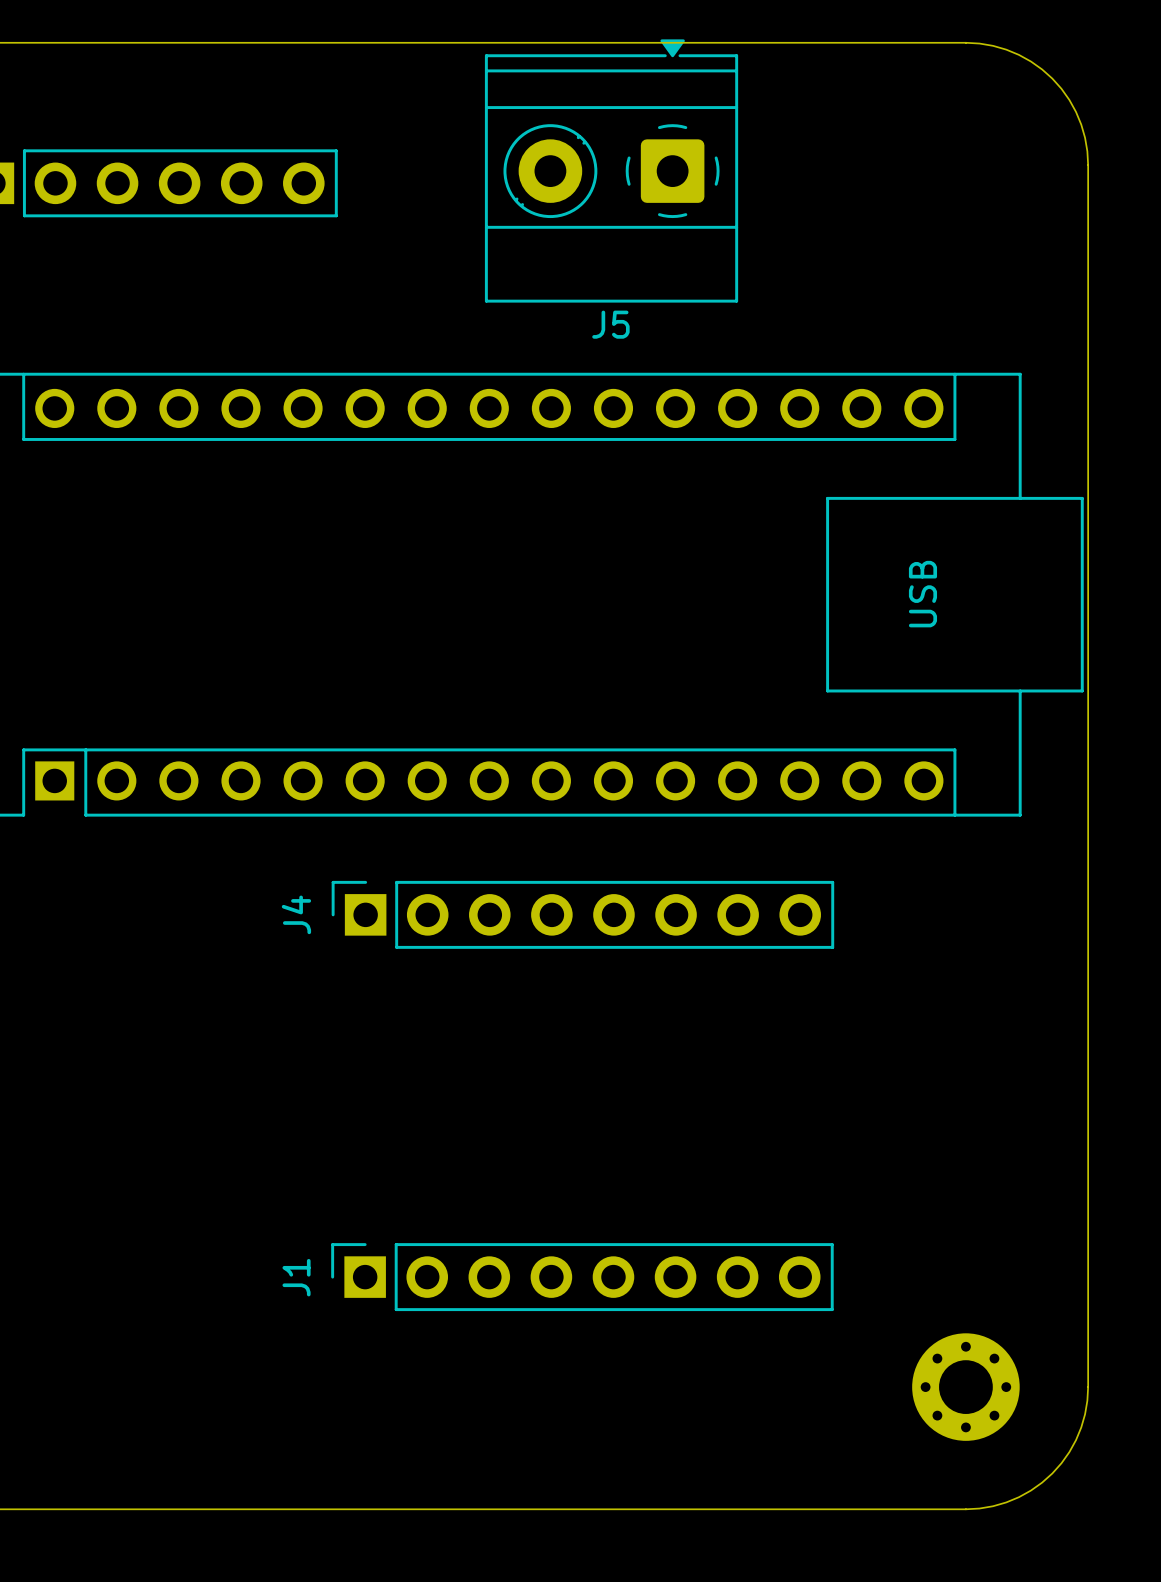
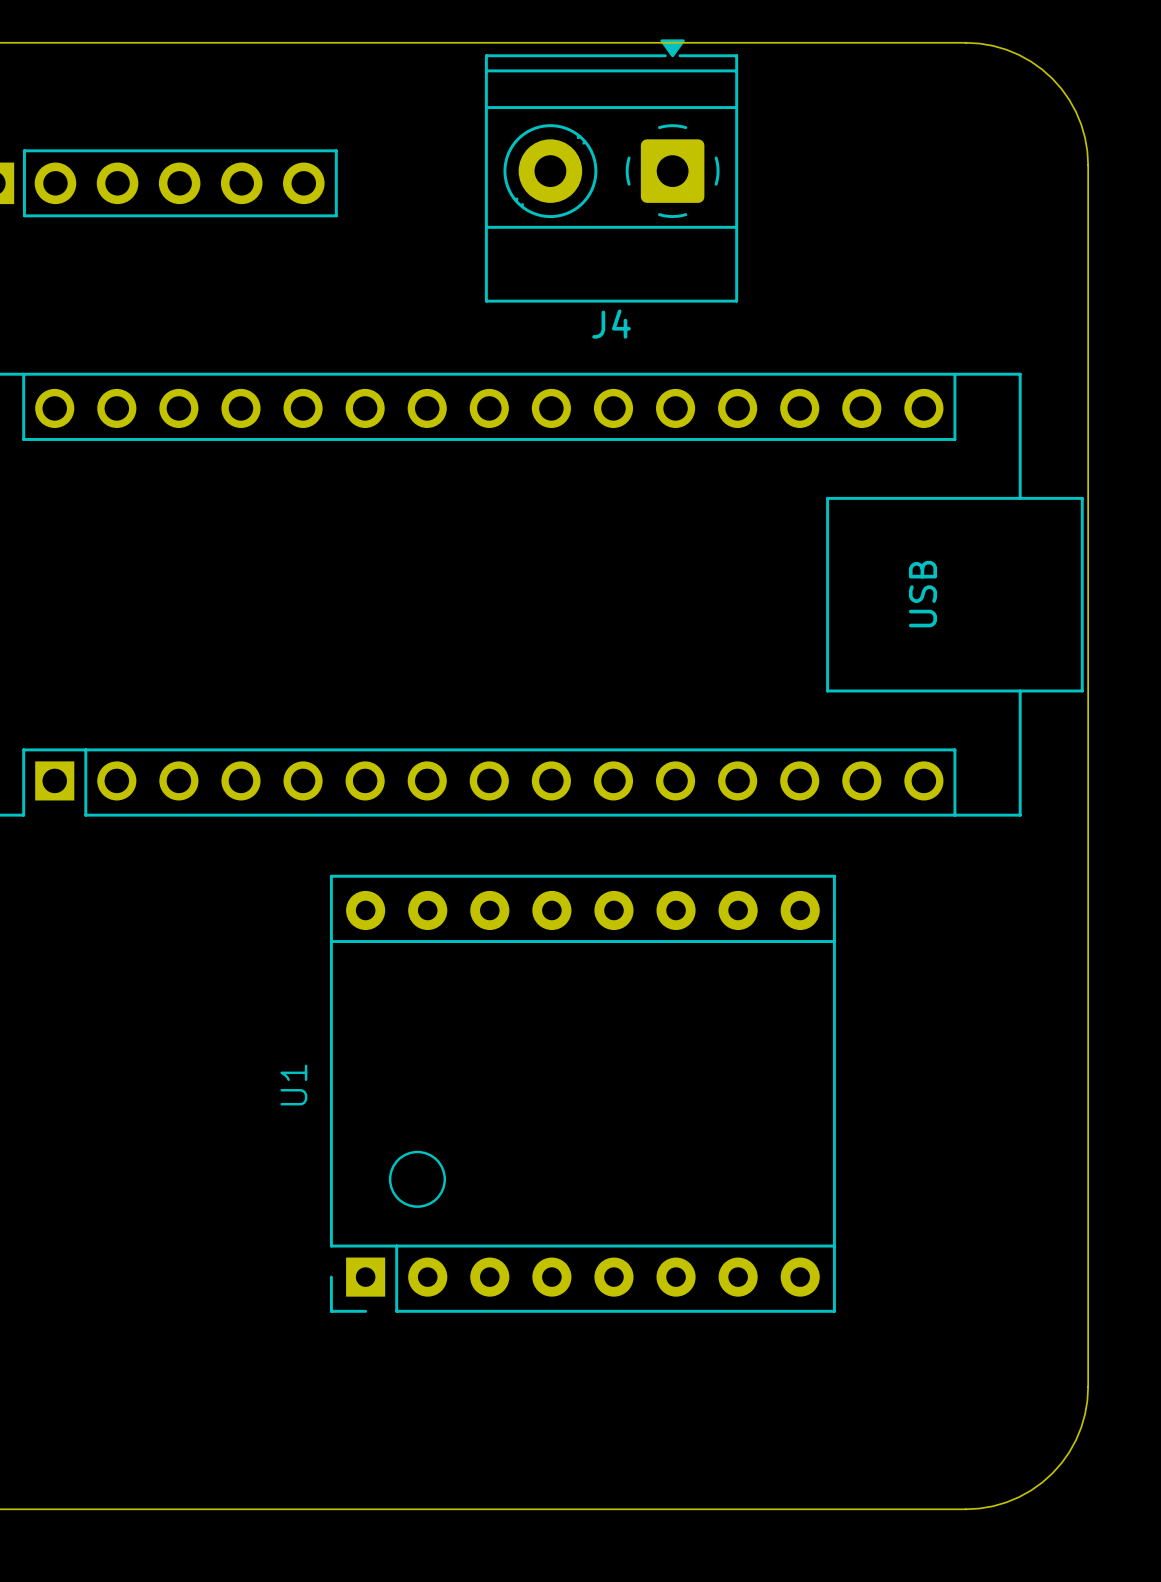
J5 name: J5 (610, 324) -> J4 (611, 324)
J4: (582, 914) -> none
U1: none -> (582, 1093)
J1: (582, 1277) -> none
part: (965, 1387) -> none

